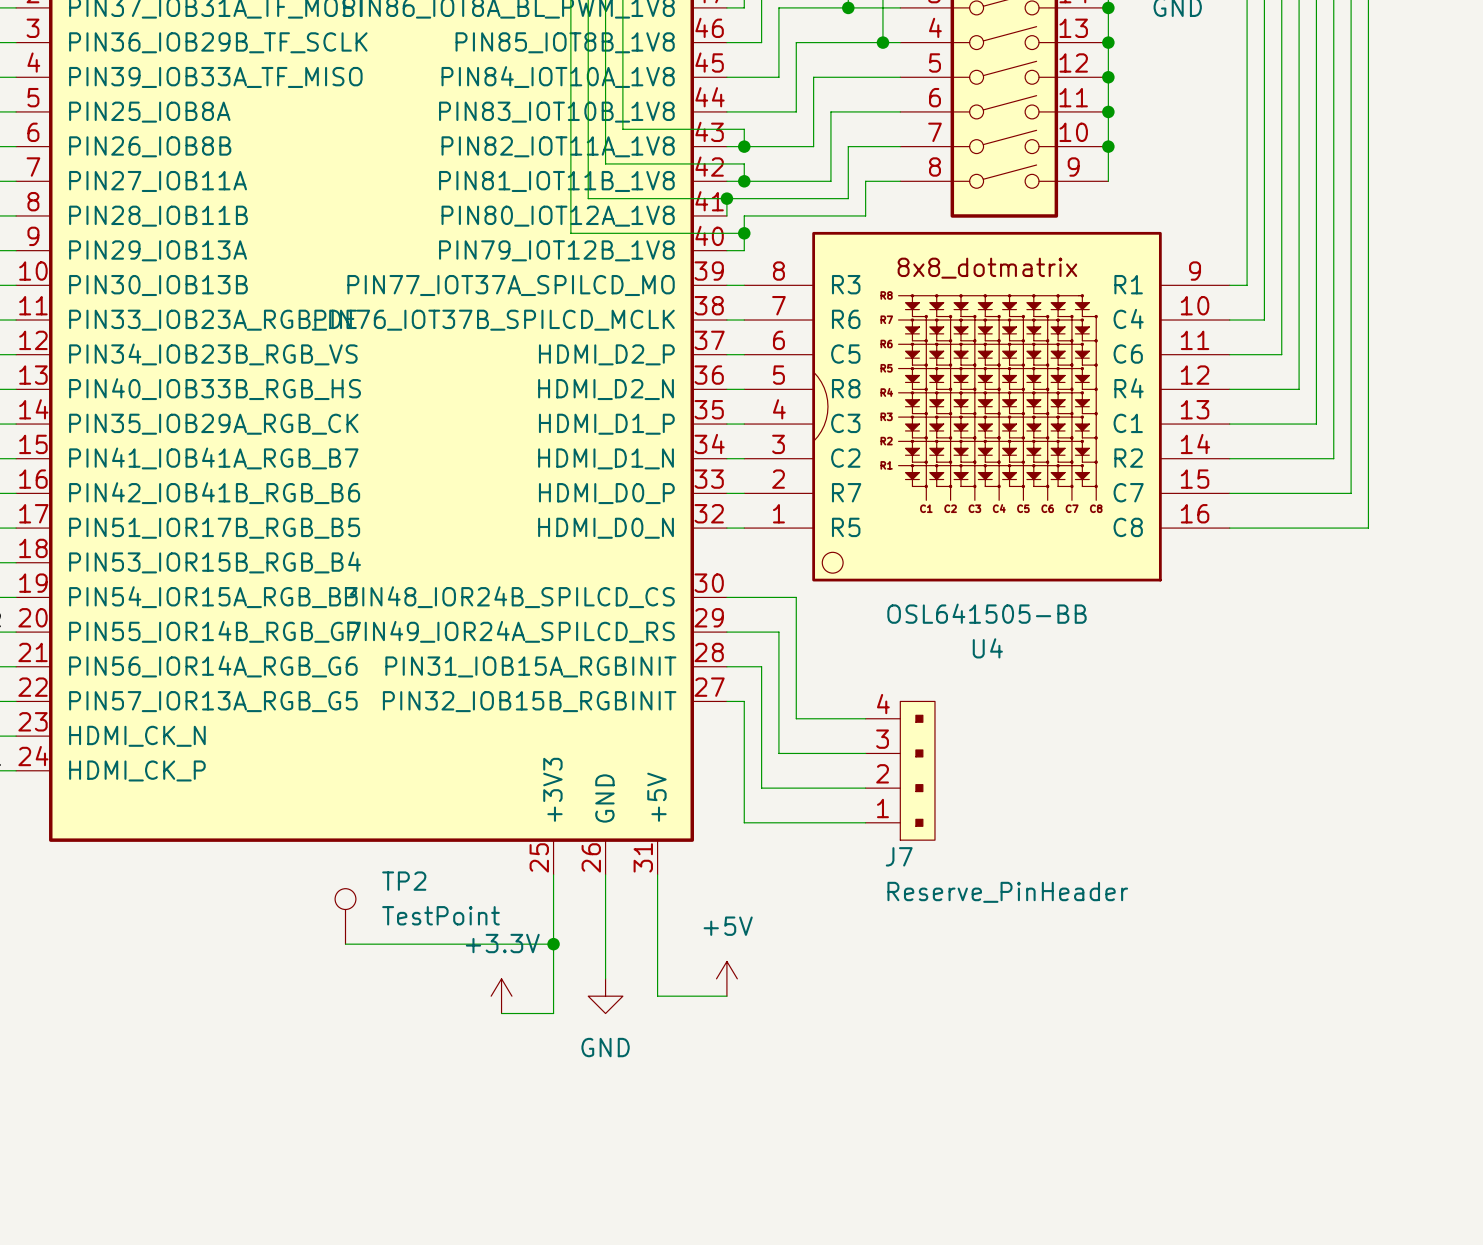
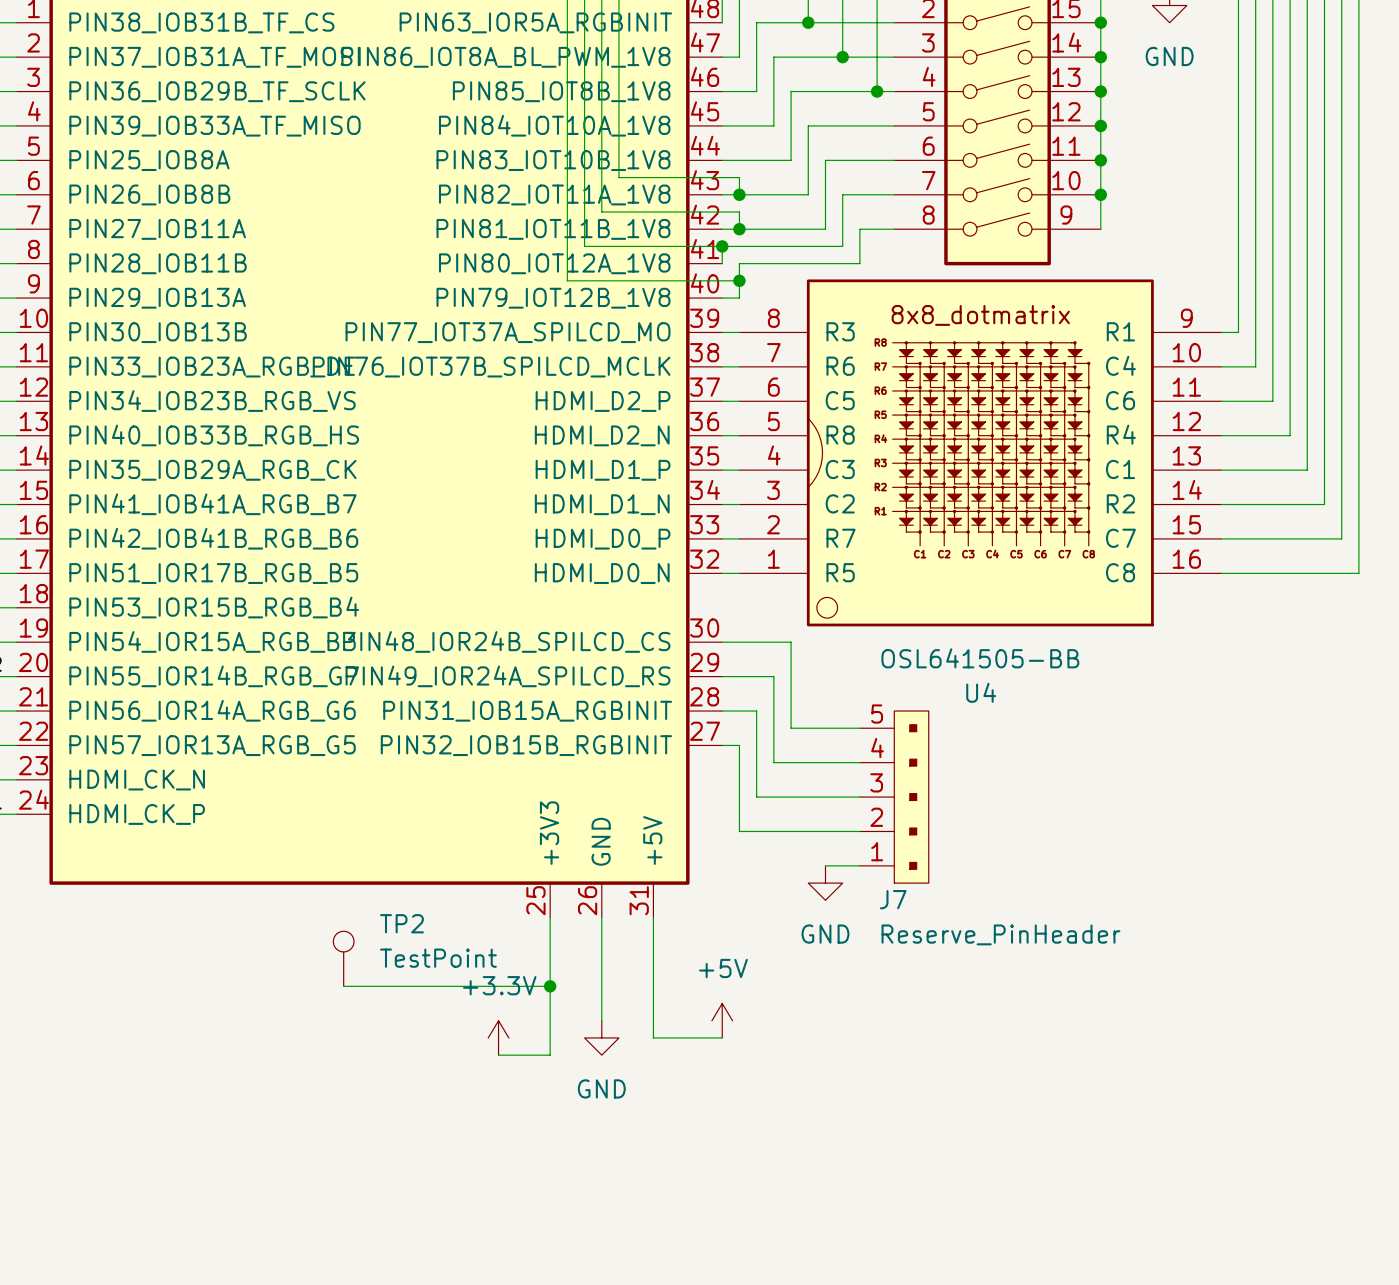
wire: (796, 684) (796, 718) -> (773, 762) (791, 762)
wire: none -> (791, 728) (859, 728)
J7 symbol: [865, 701, 935, 841] -> [859, 711, 929, 884]
wire: (778, 718) (778, 753) -> (756, 797) (773, 797)
wire: (761, 753) (761, 788) -> (739, 831) (756, 831)
wire: (744, 788) (744, 822) (830, 822) -> none
power symbol: none -> GND (825, 883)

